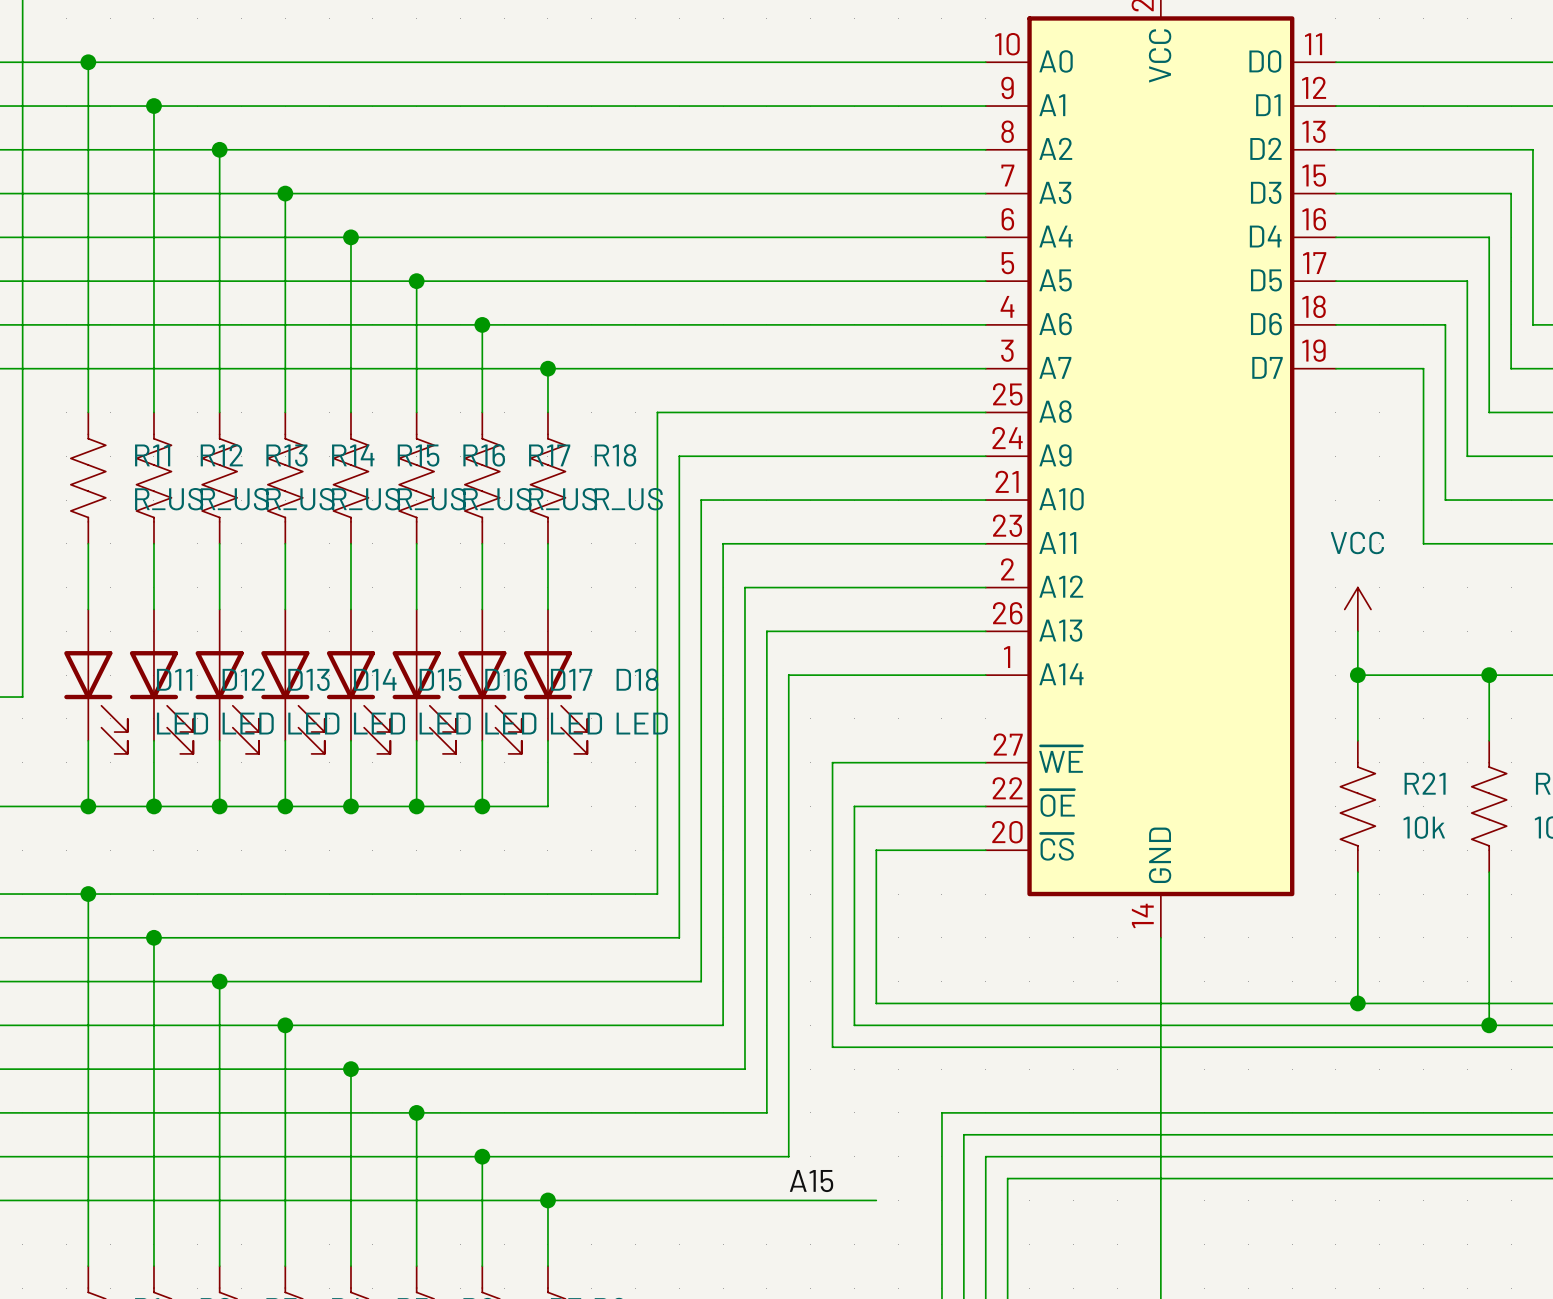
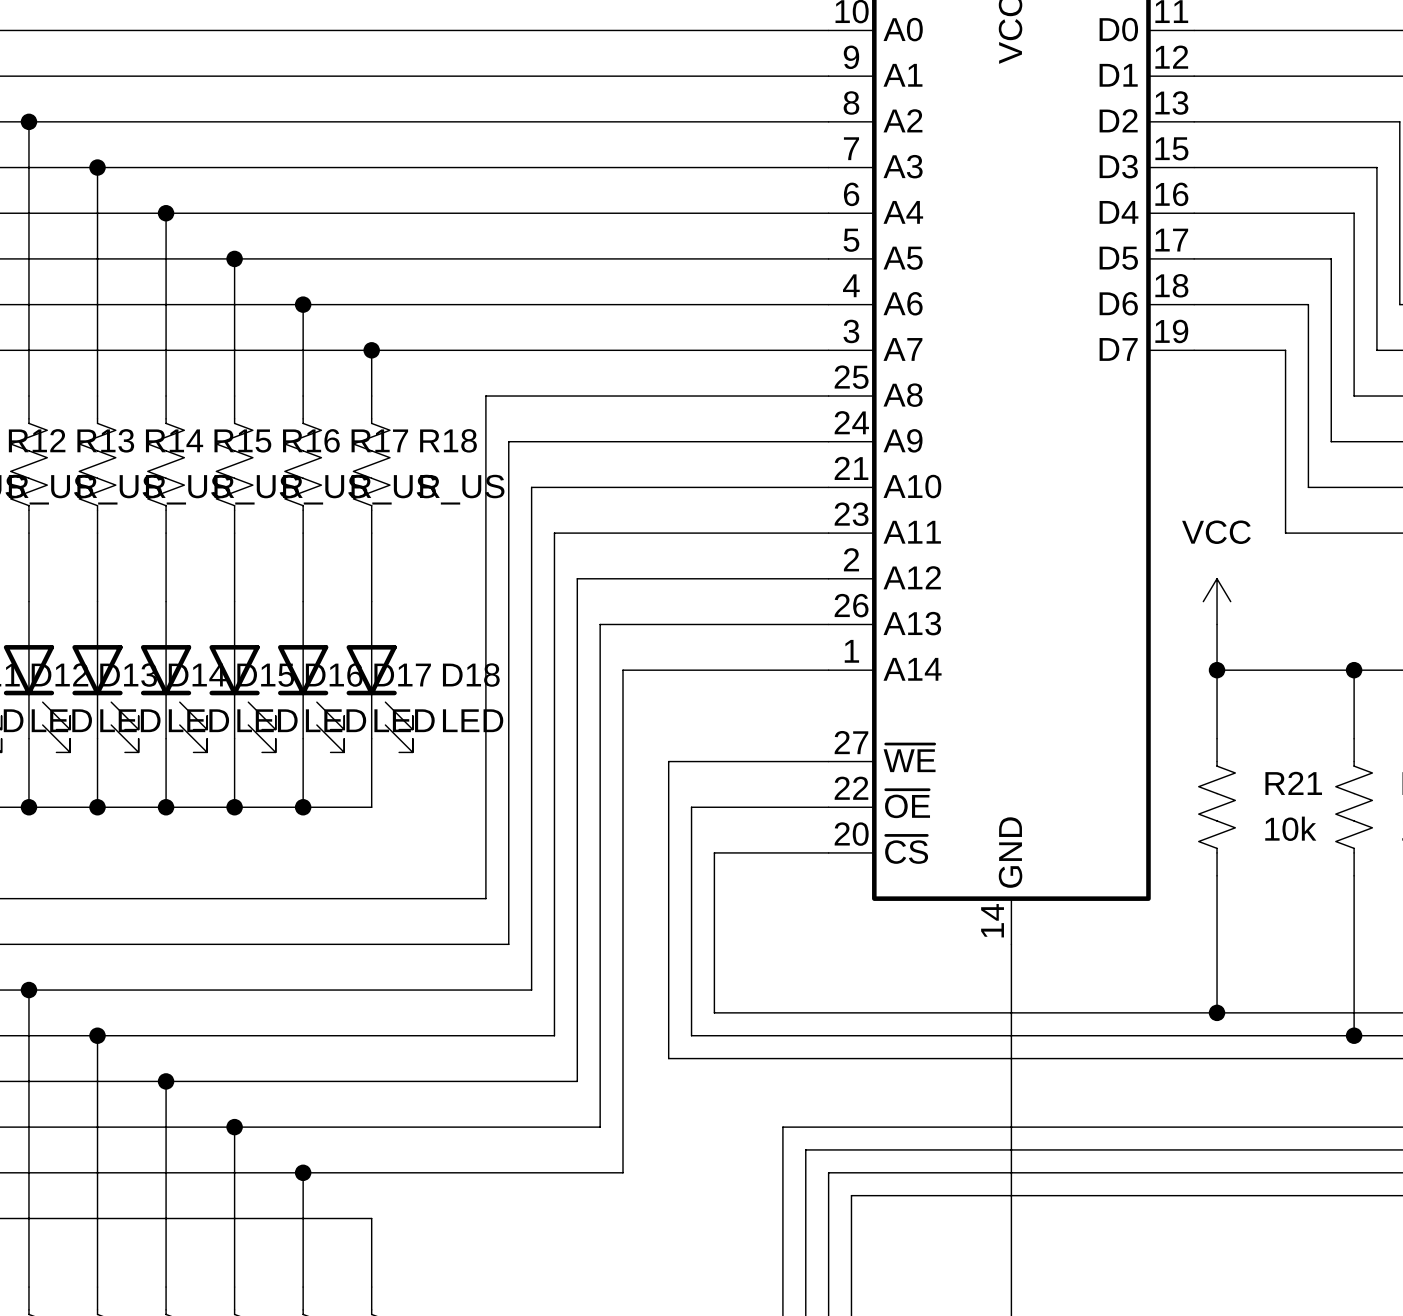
label: A15 (811, 1181) -> none
wire: (547, 1200) (876, 1200) -> none
junction: (547, 1200) -> none

